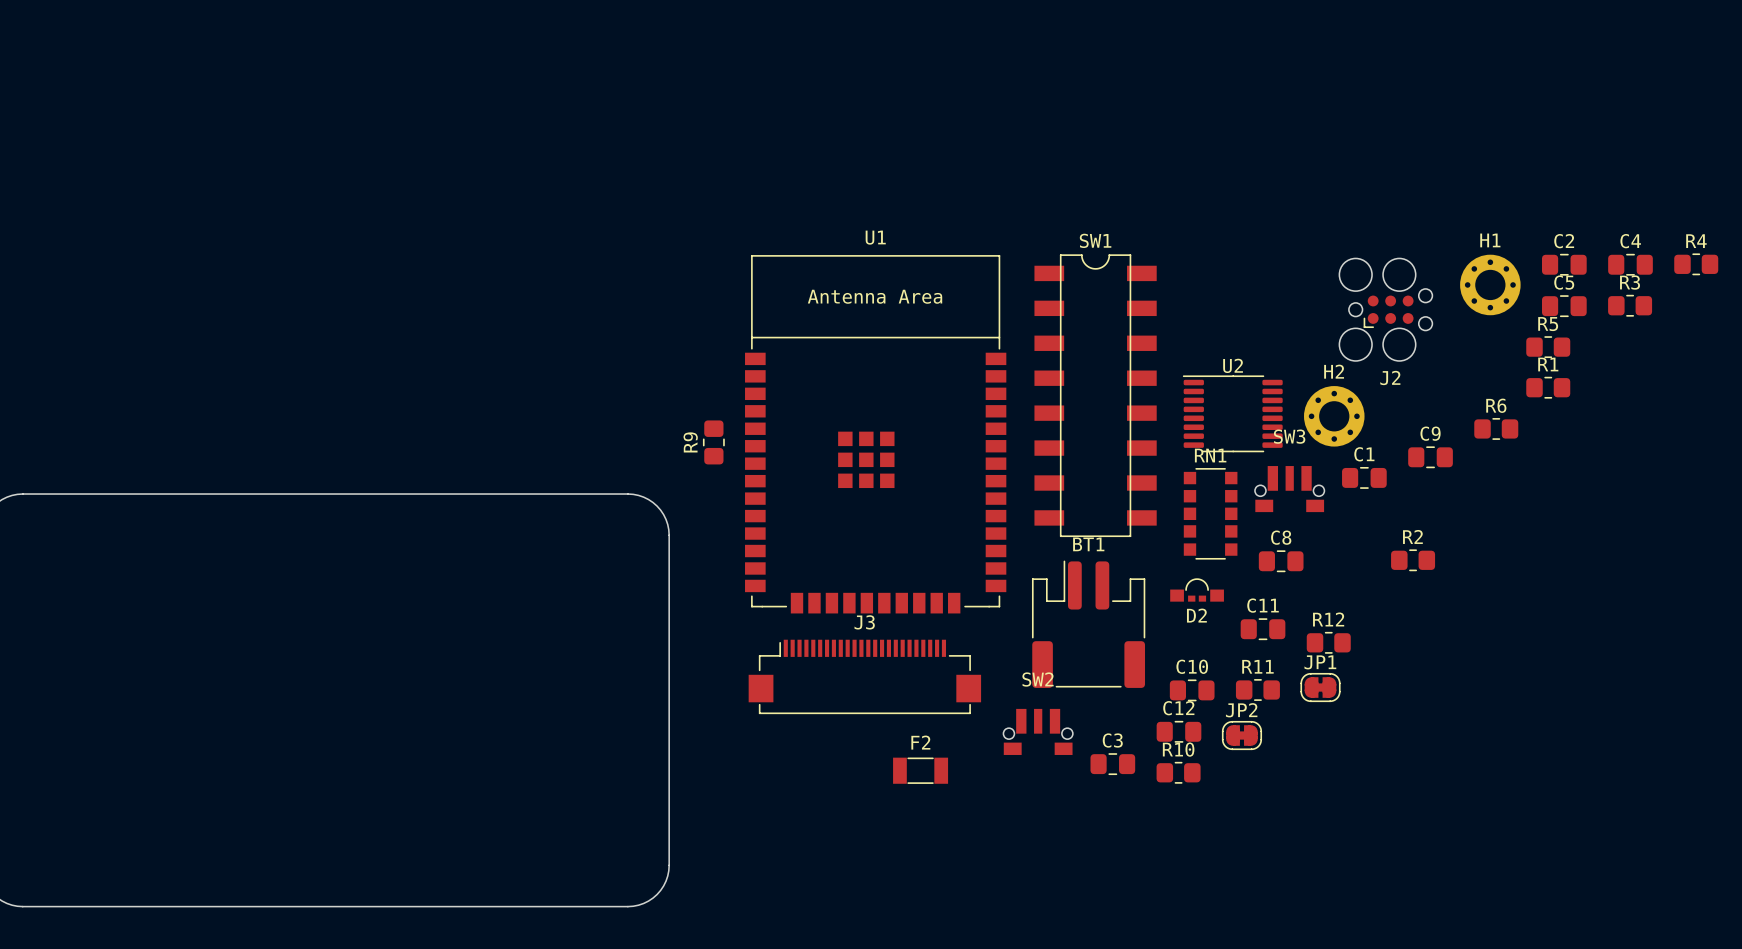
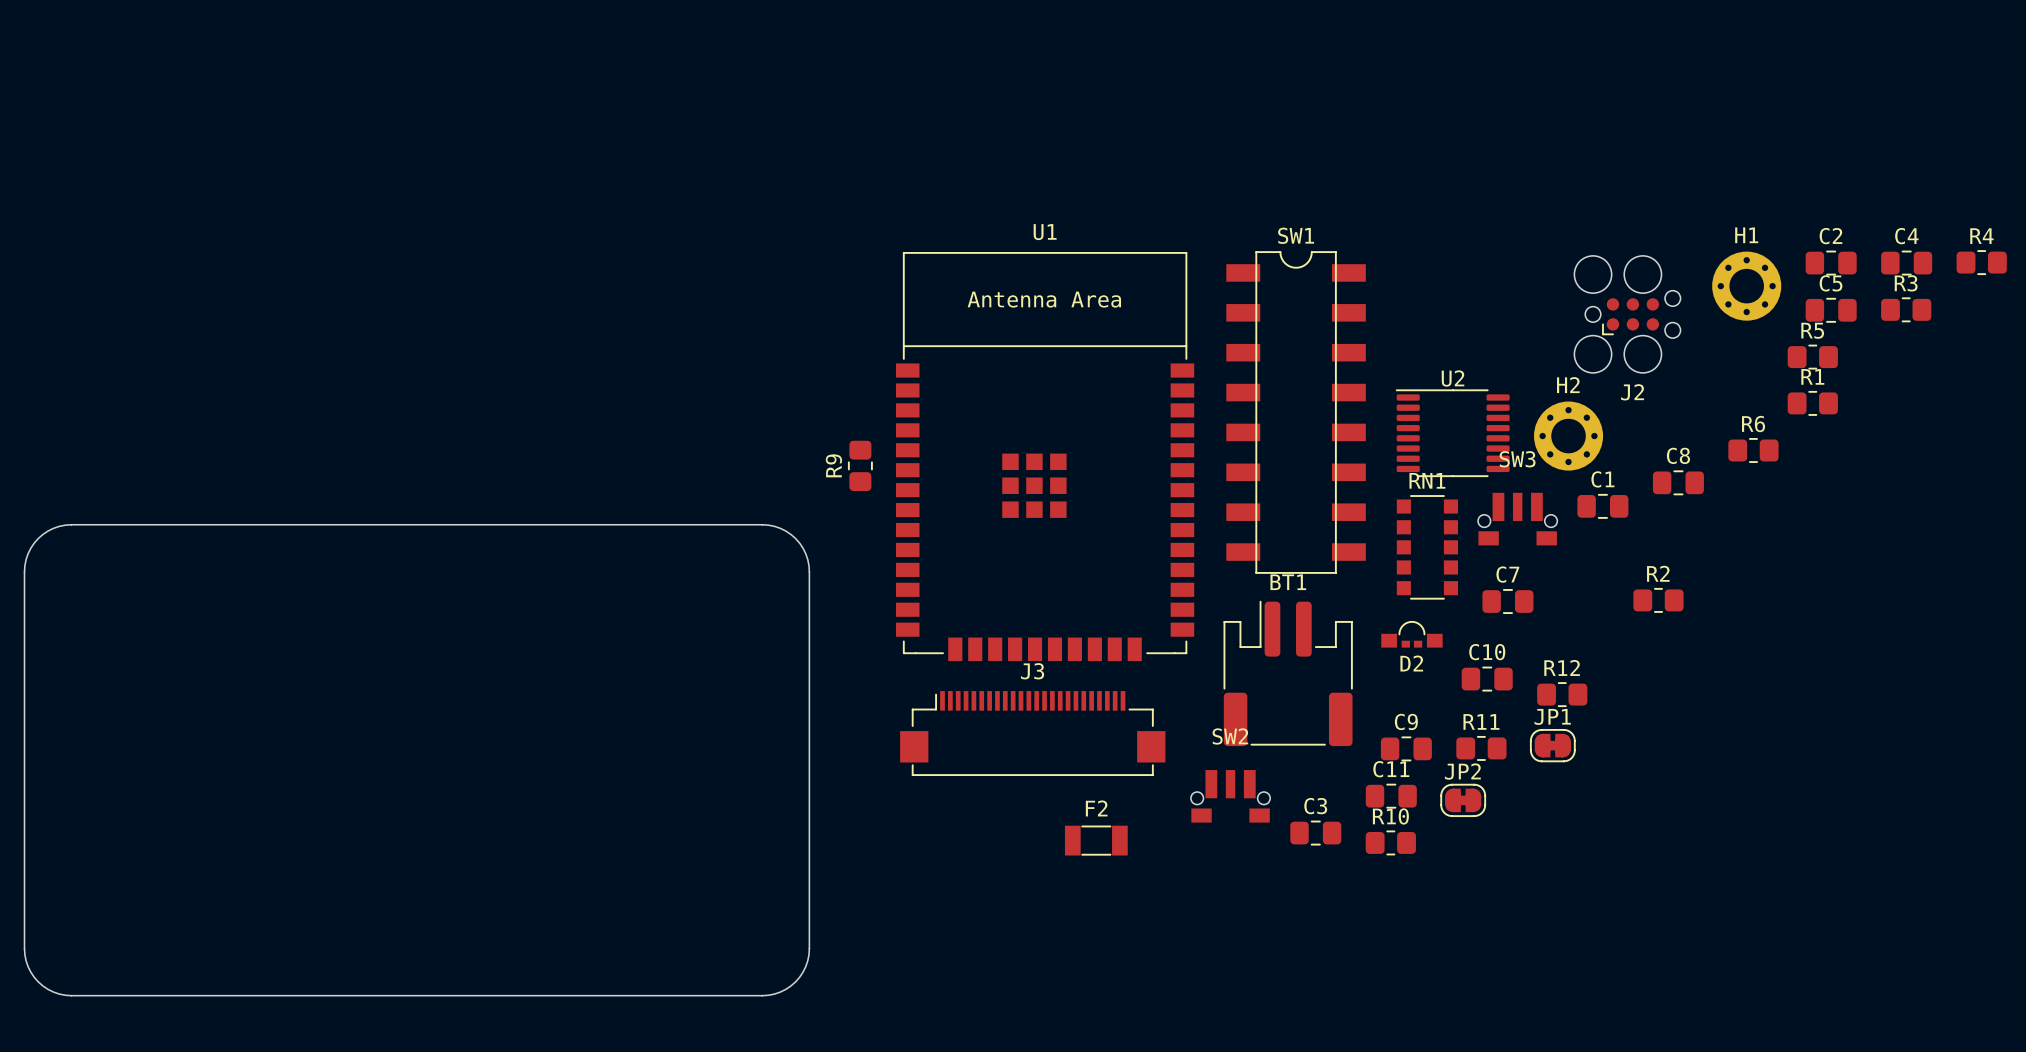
C9 name: C9 (1430, 433) -> C8 (1678, 455)
C8 name: C8 (1281, 537) -> C7 (1507, 574)
C11 name: C11 (1263, 605) -> C10 (1487, 652)
C10 name: C10 (1192, 666) -> C9 (1406, 721)
C12 name: C12 (1178, 708) -> C11 (1391, 769)

